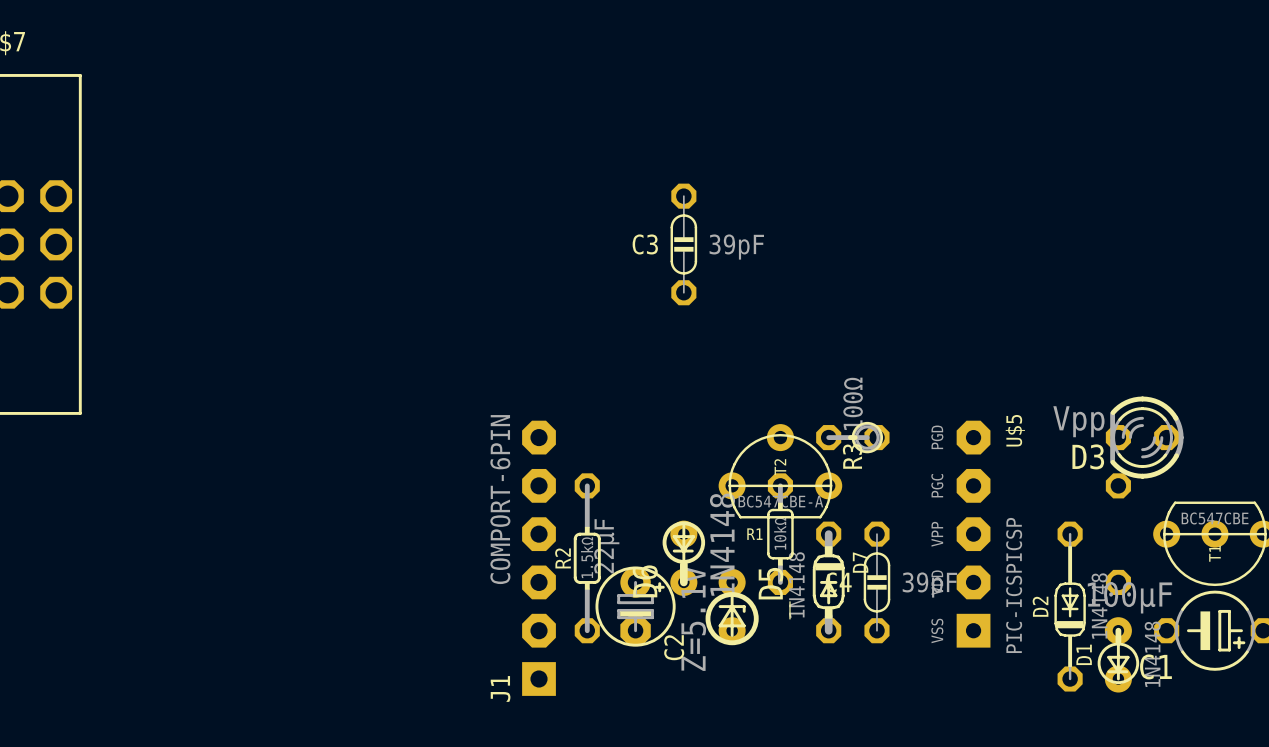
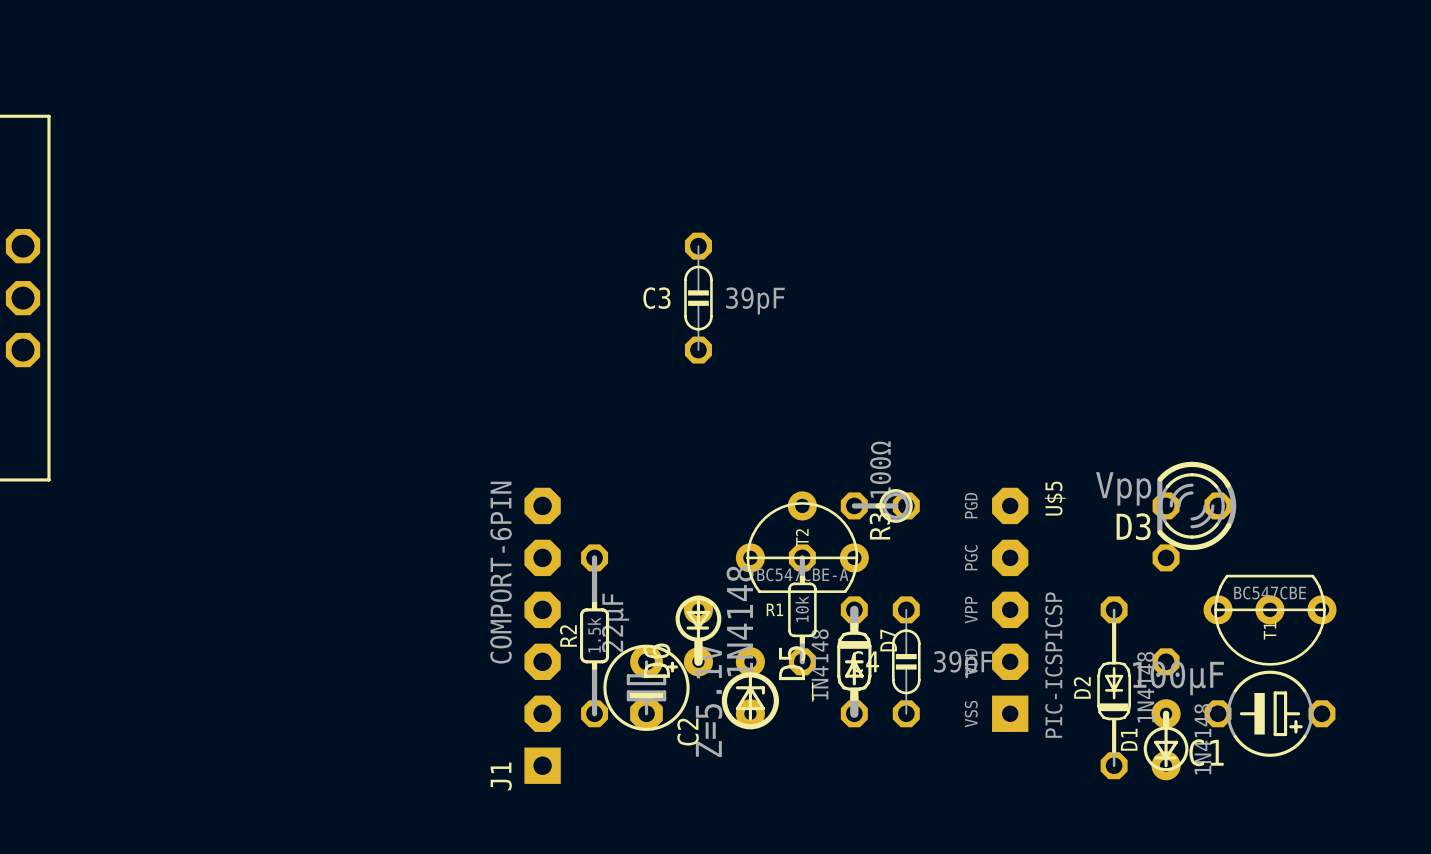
R1 value: 10kΩ (780, 533) -> 10k (802, 609)
R2 value: 1.5kΩ (587, 557) -> 1.5k (594, 635)

